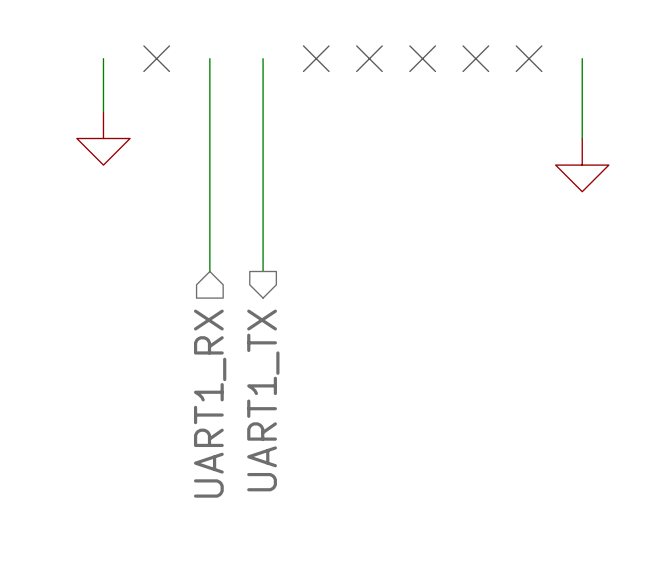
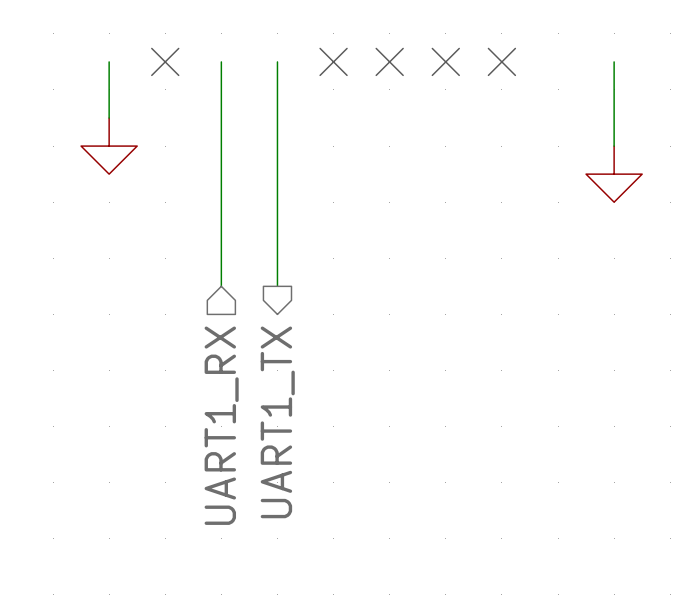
no-connect mark: (529, 58) -> none

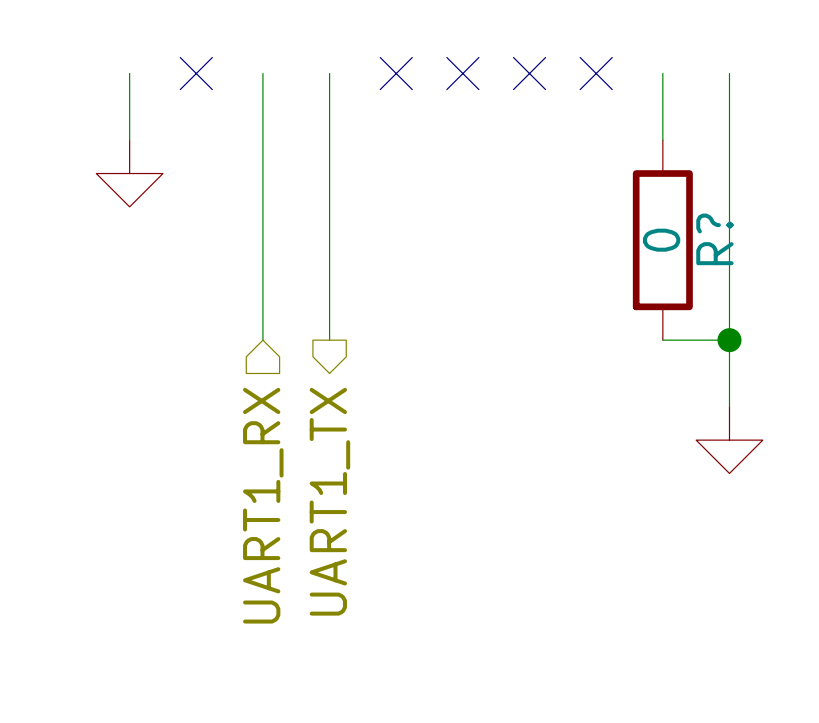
wire: none -> (662, 73) (662, 140)
wire: none -> (729, 173) (729, 406)
power symbol position: (614, 174) -> (729, 440)
R?: none -> 0 (662, 240)
wire: none -> (662, 340) (729, 340)
junction: none -> (729, 340)

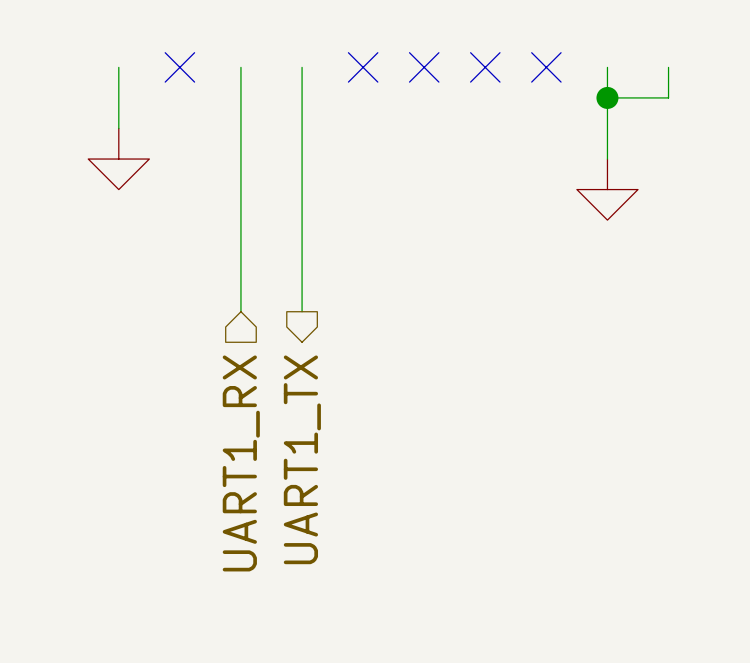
junction: none -> (607, 97)
wire: (729, 106) (729, 406) -> (668, 97) (607, 97)
R?: 0 (662, 240) -> none
wire: (662, 340) (729, 340) -> none
junction: (729, 340) -> none
power symbol position: (729, 440) -> (607, 189)

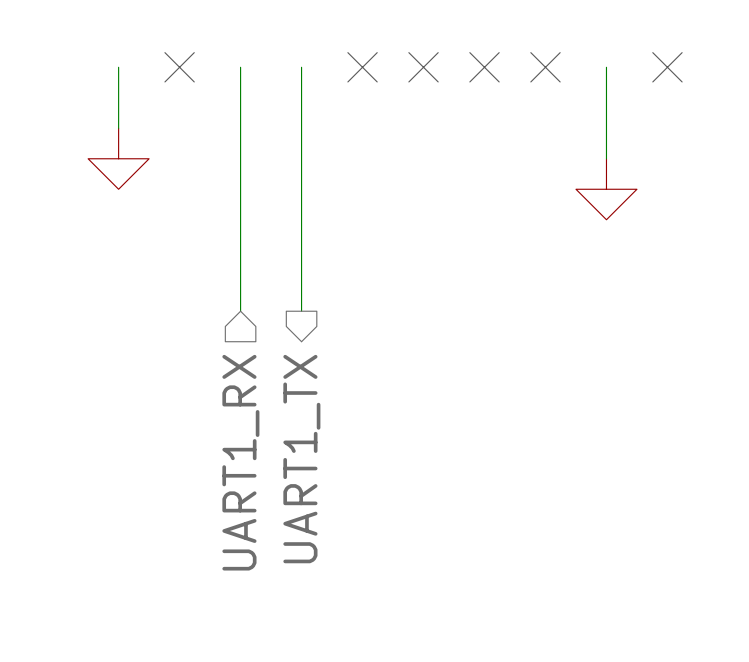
wire: (668, 67) (668, 97) (607, 97) -> none
no-connect mark: none -> (667, 67)
junction: (607, 97) -> none

